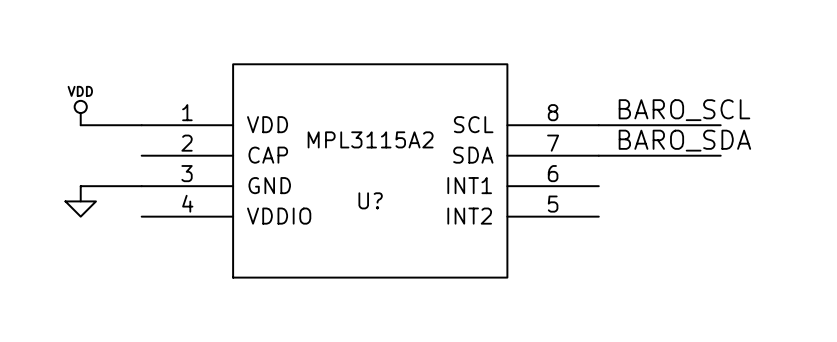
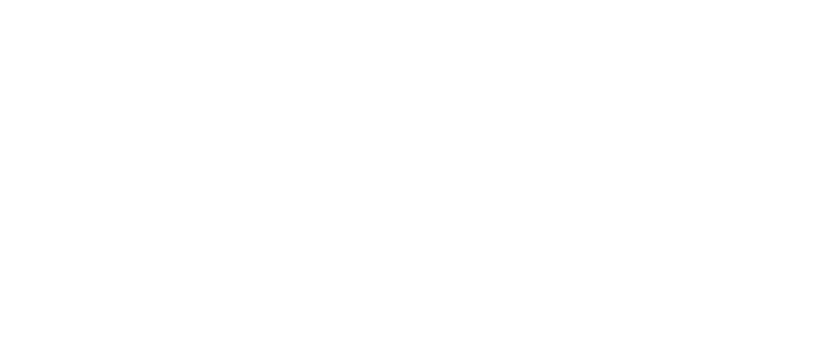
label: BARO_SCL (684, 110) -> none
power symbol: VDD (80, 113) -> none
wire: (80, 125) (141, 125) -> none
wire: (598, 125) (720, 125) -> none
label: BARO_SDA (684, 140) -> none
wire: (598, 155) (720, 155) -> none
U?: MPL3115A2 (370, 170) -> none
wire: (141, 186) (80, 186) (80, 201) -> none
power symbol: (80, 209) -> none

